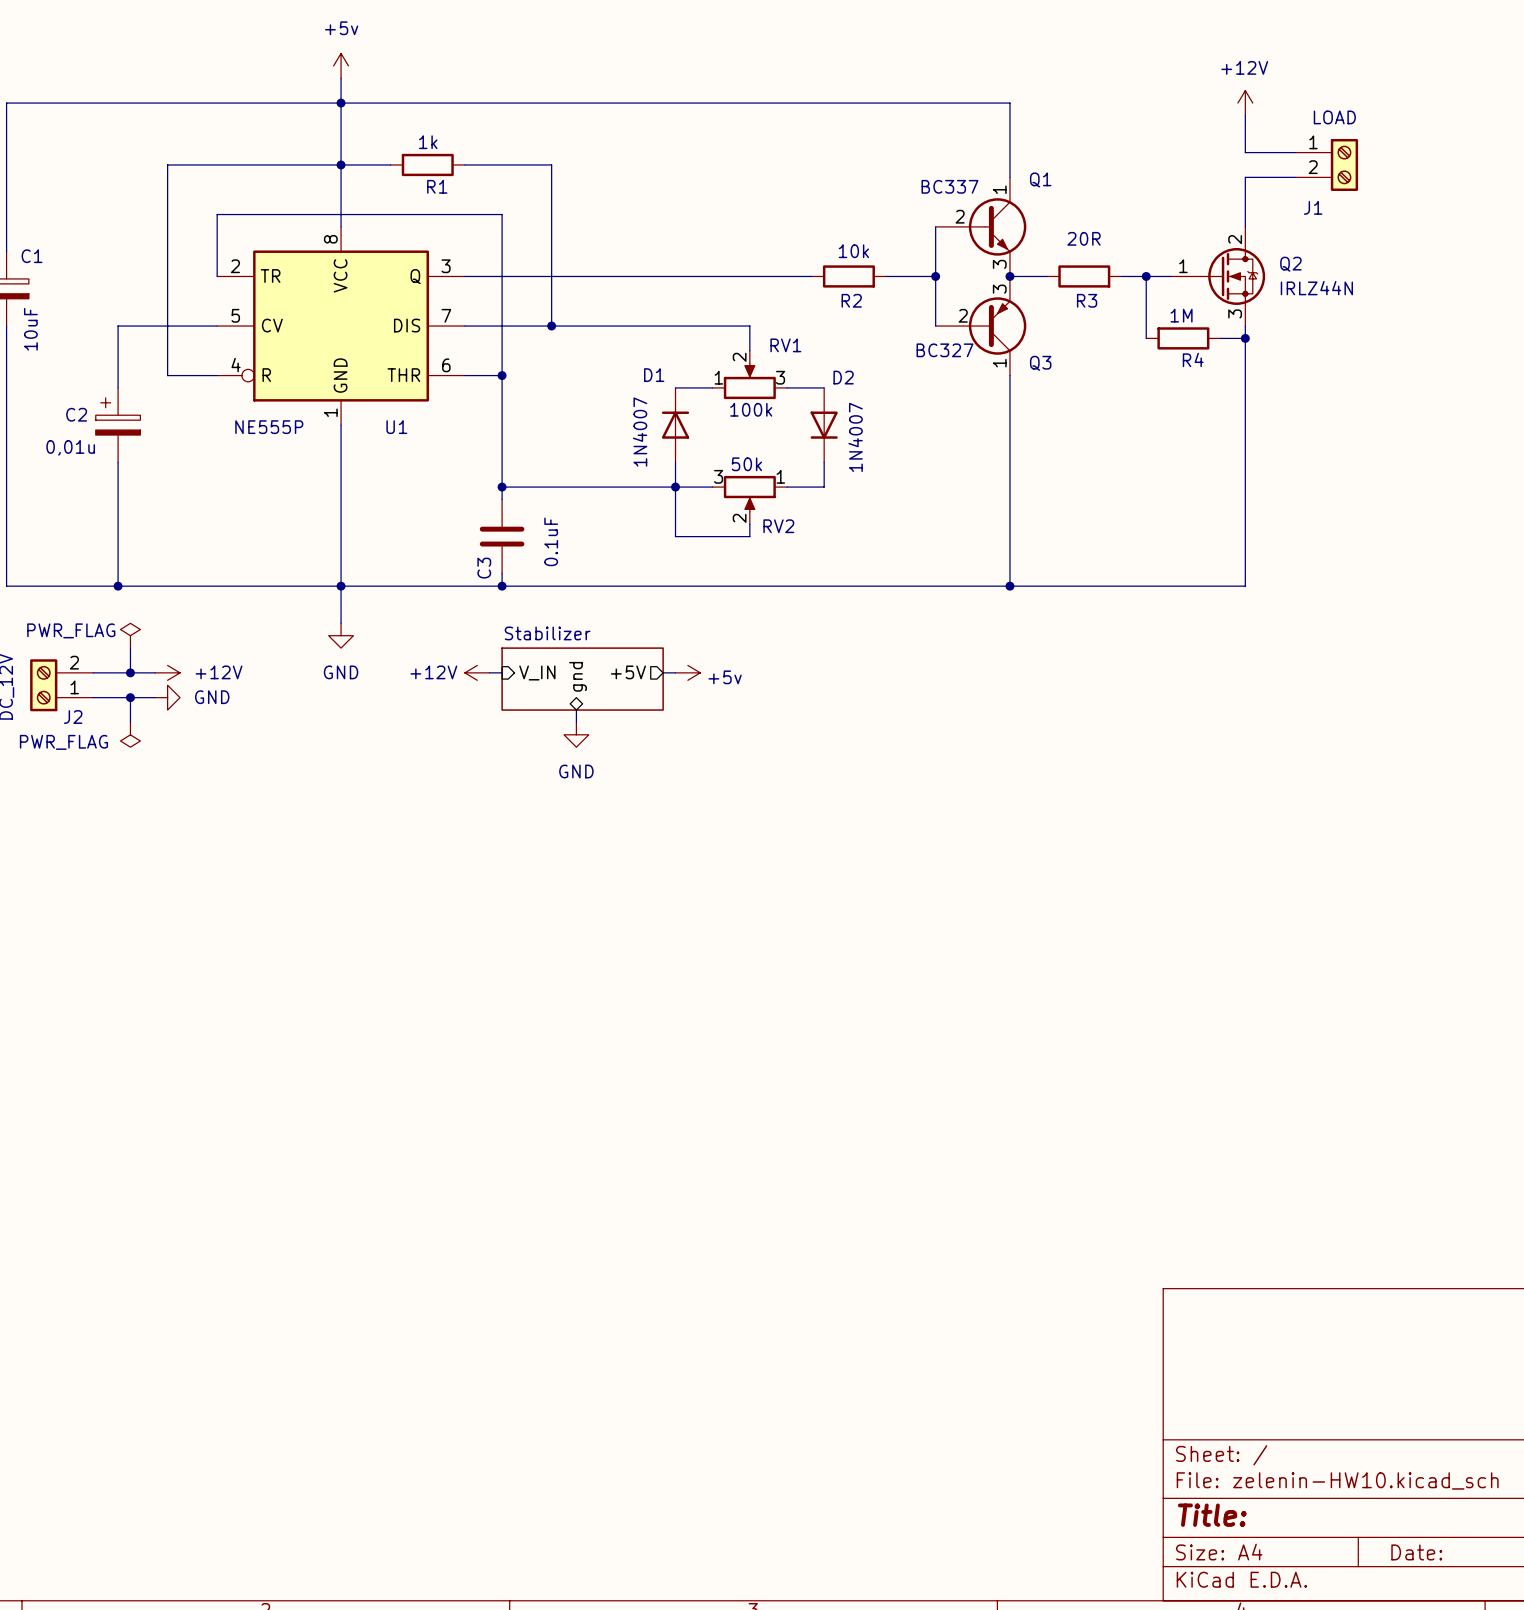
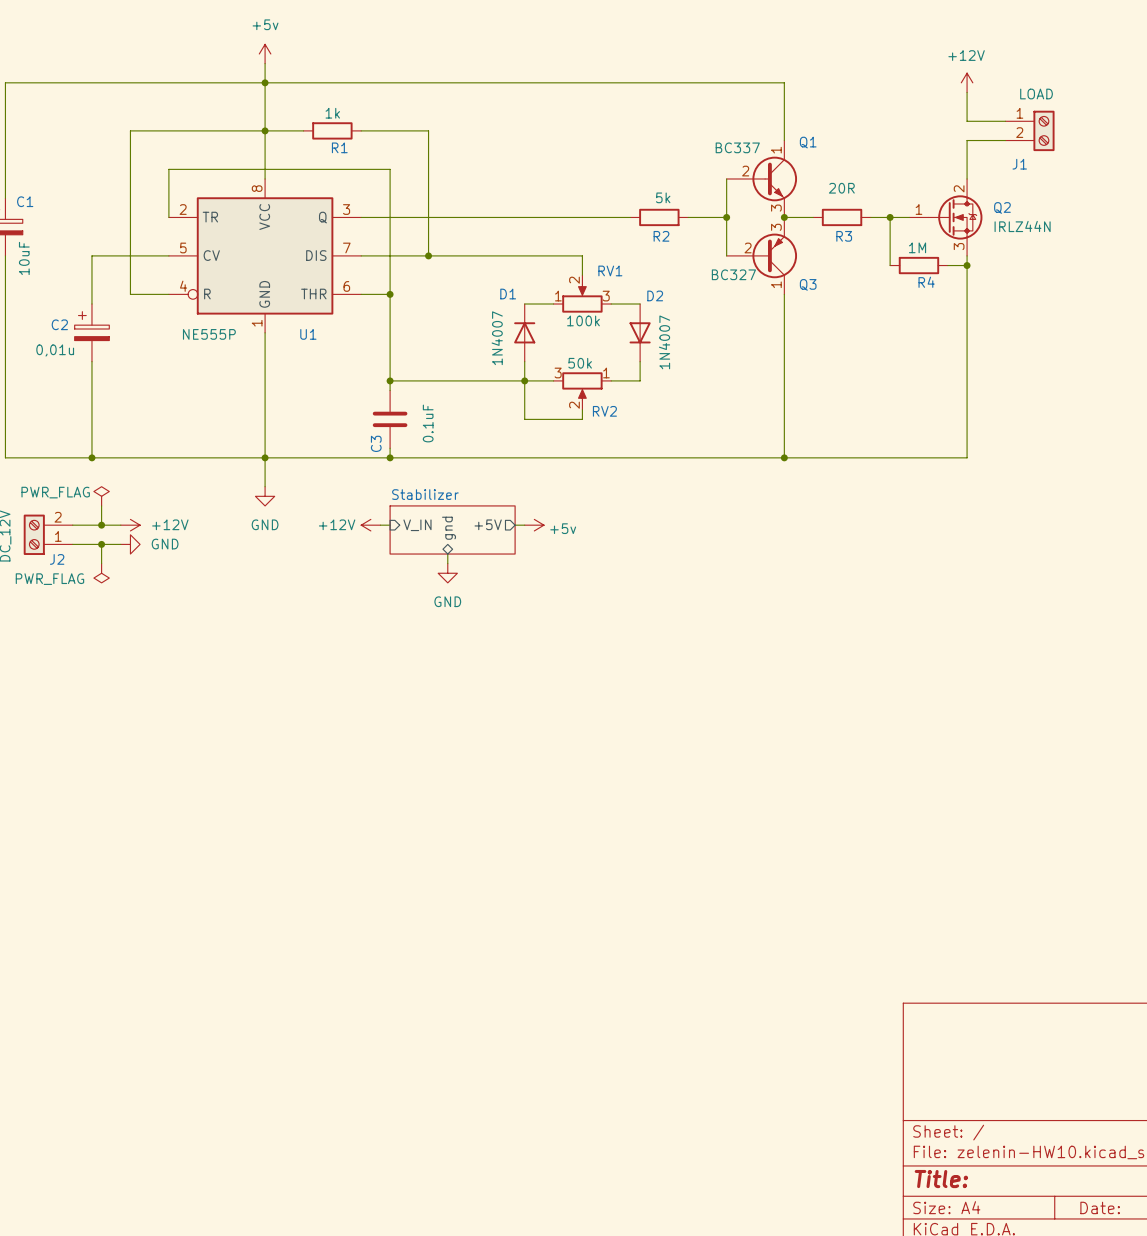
R2 value: 10k (853, 251) -> 5k (663, 197)

